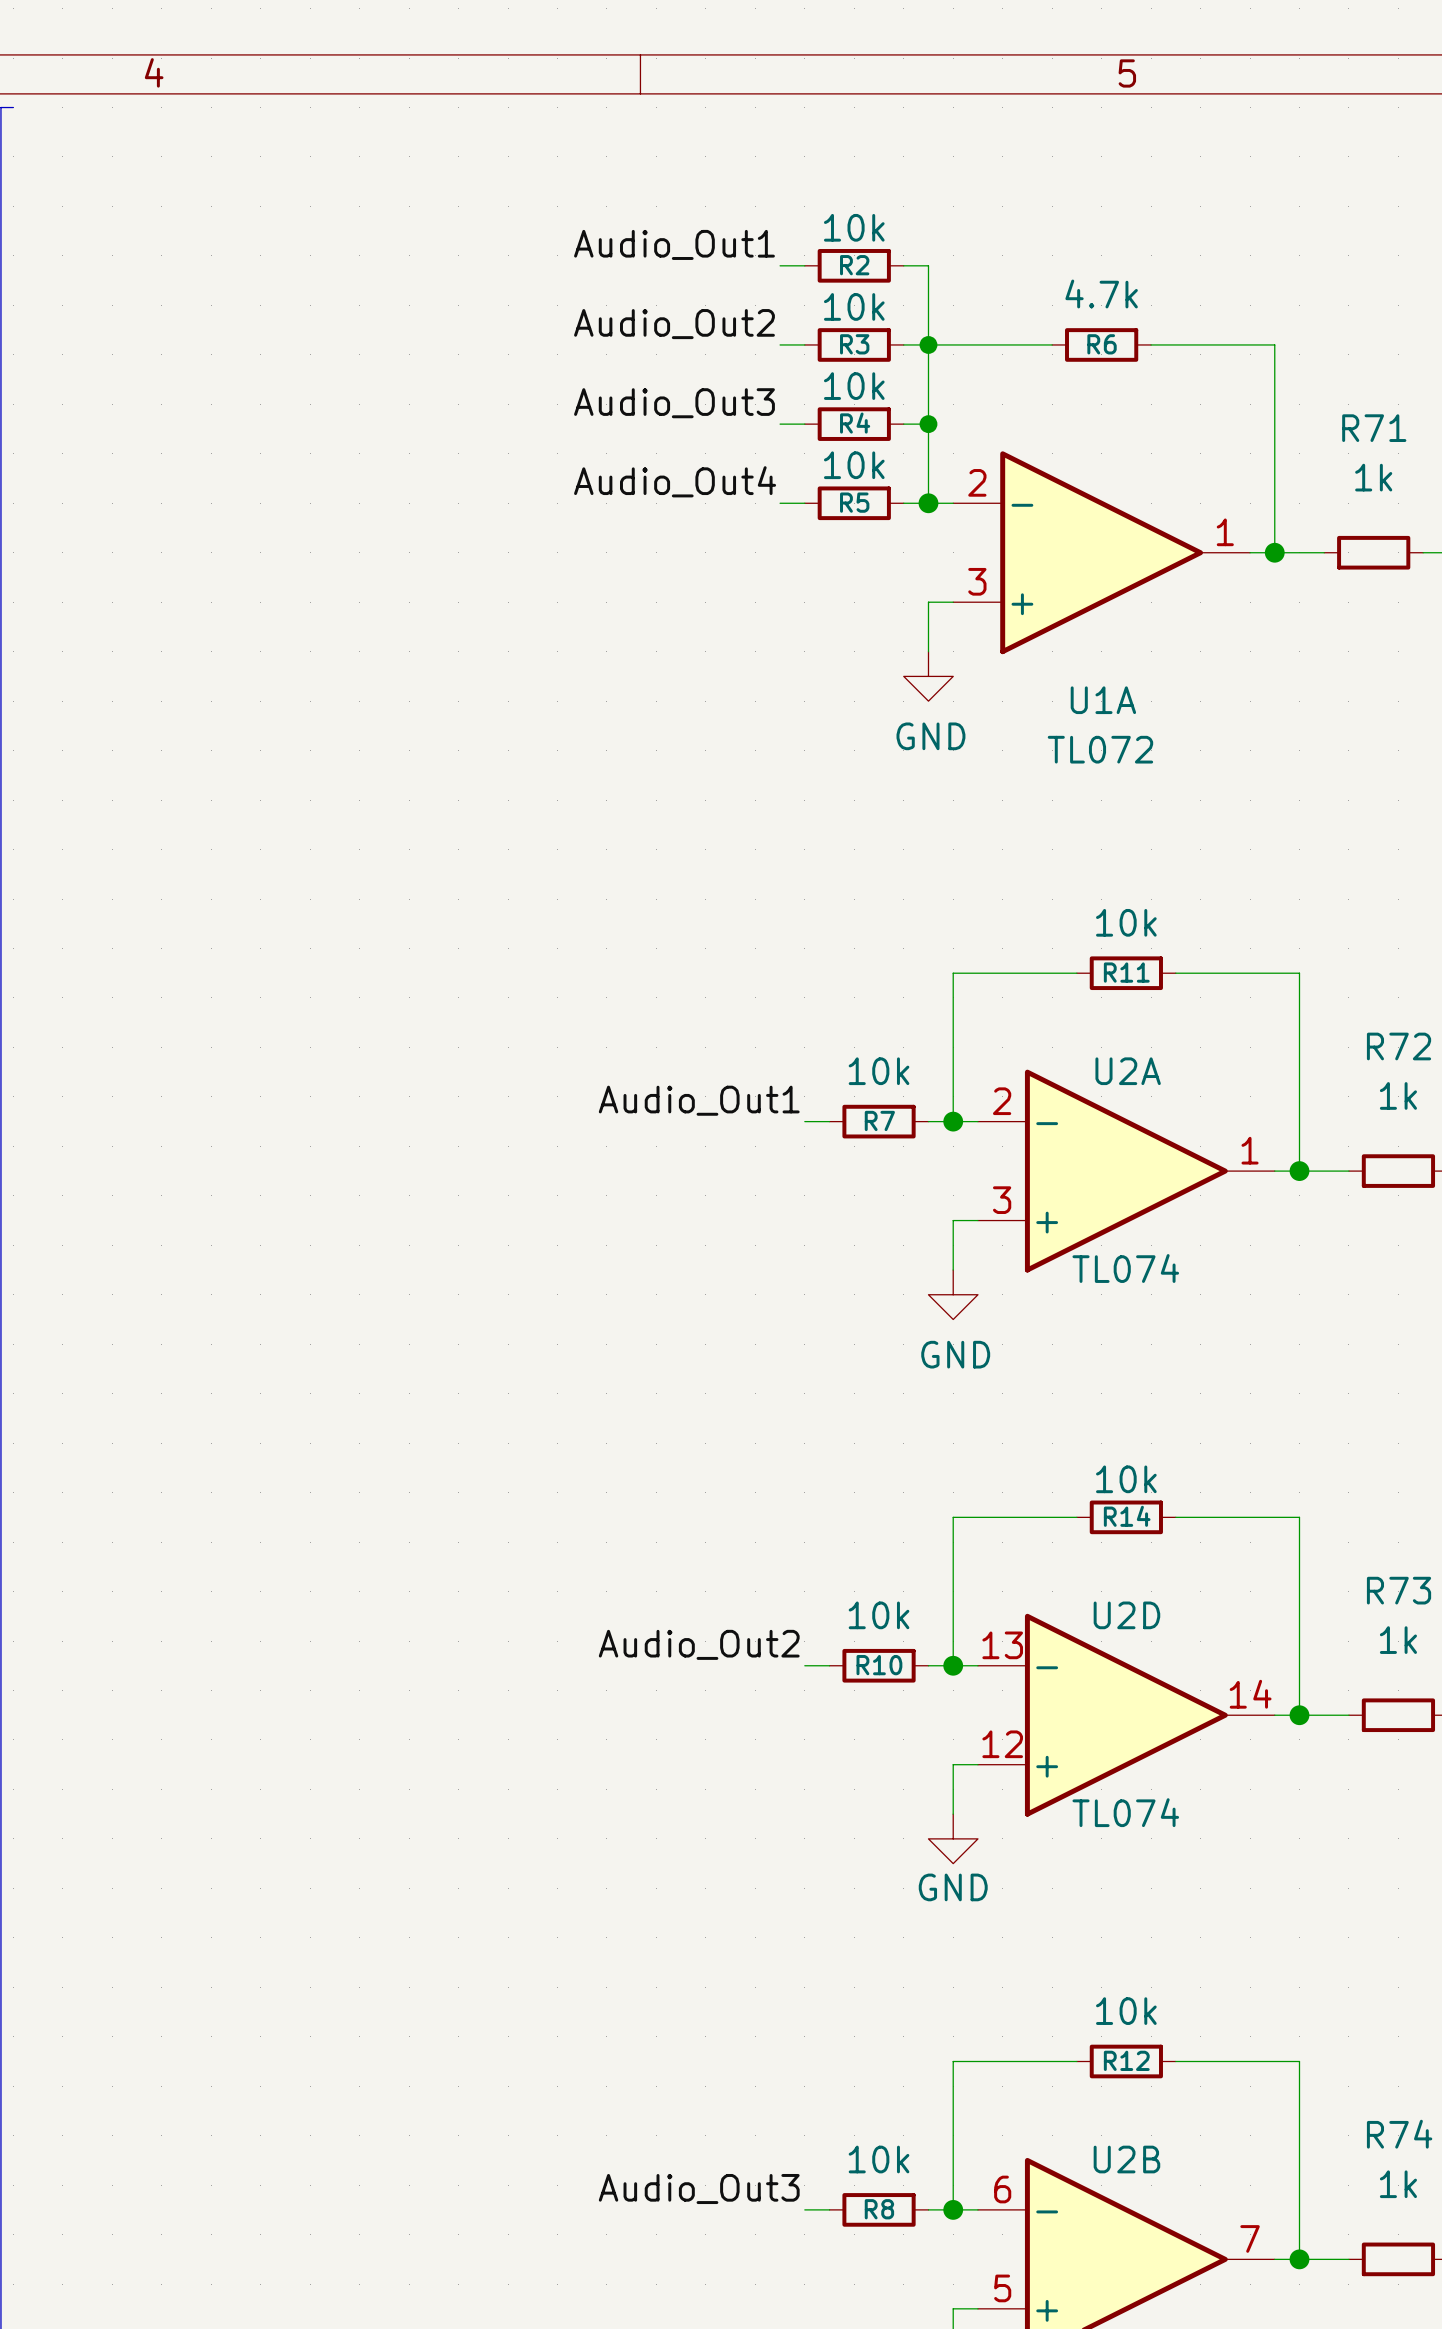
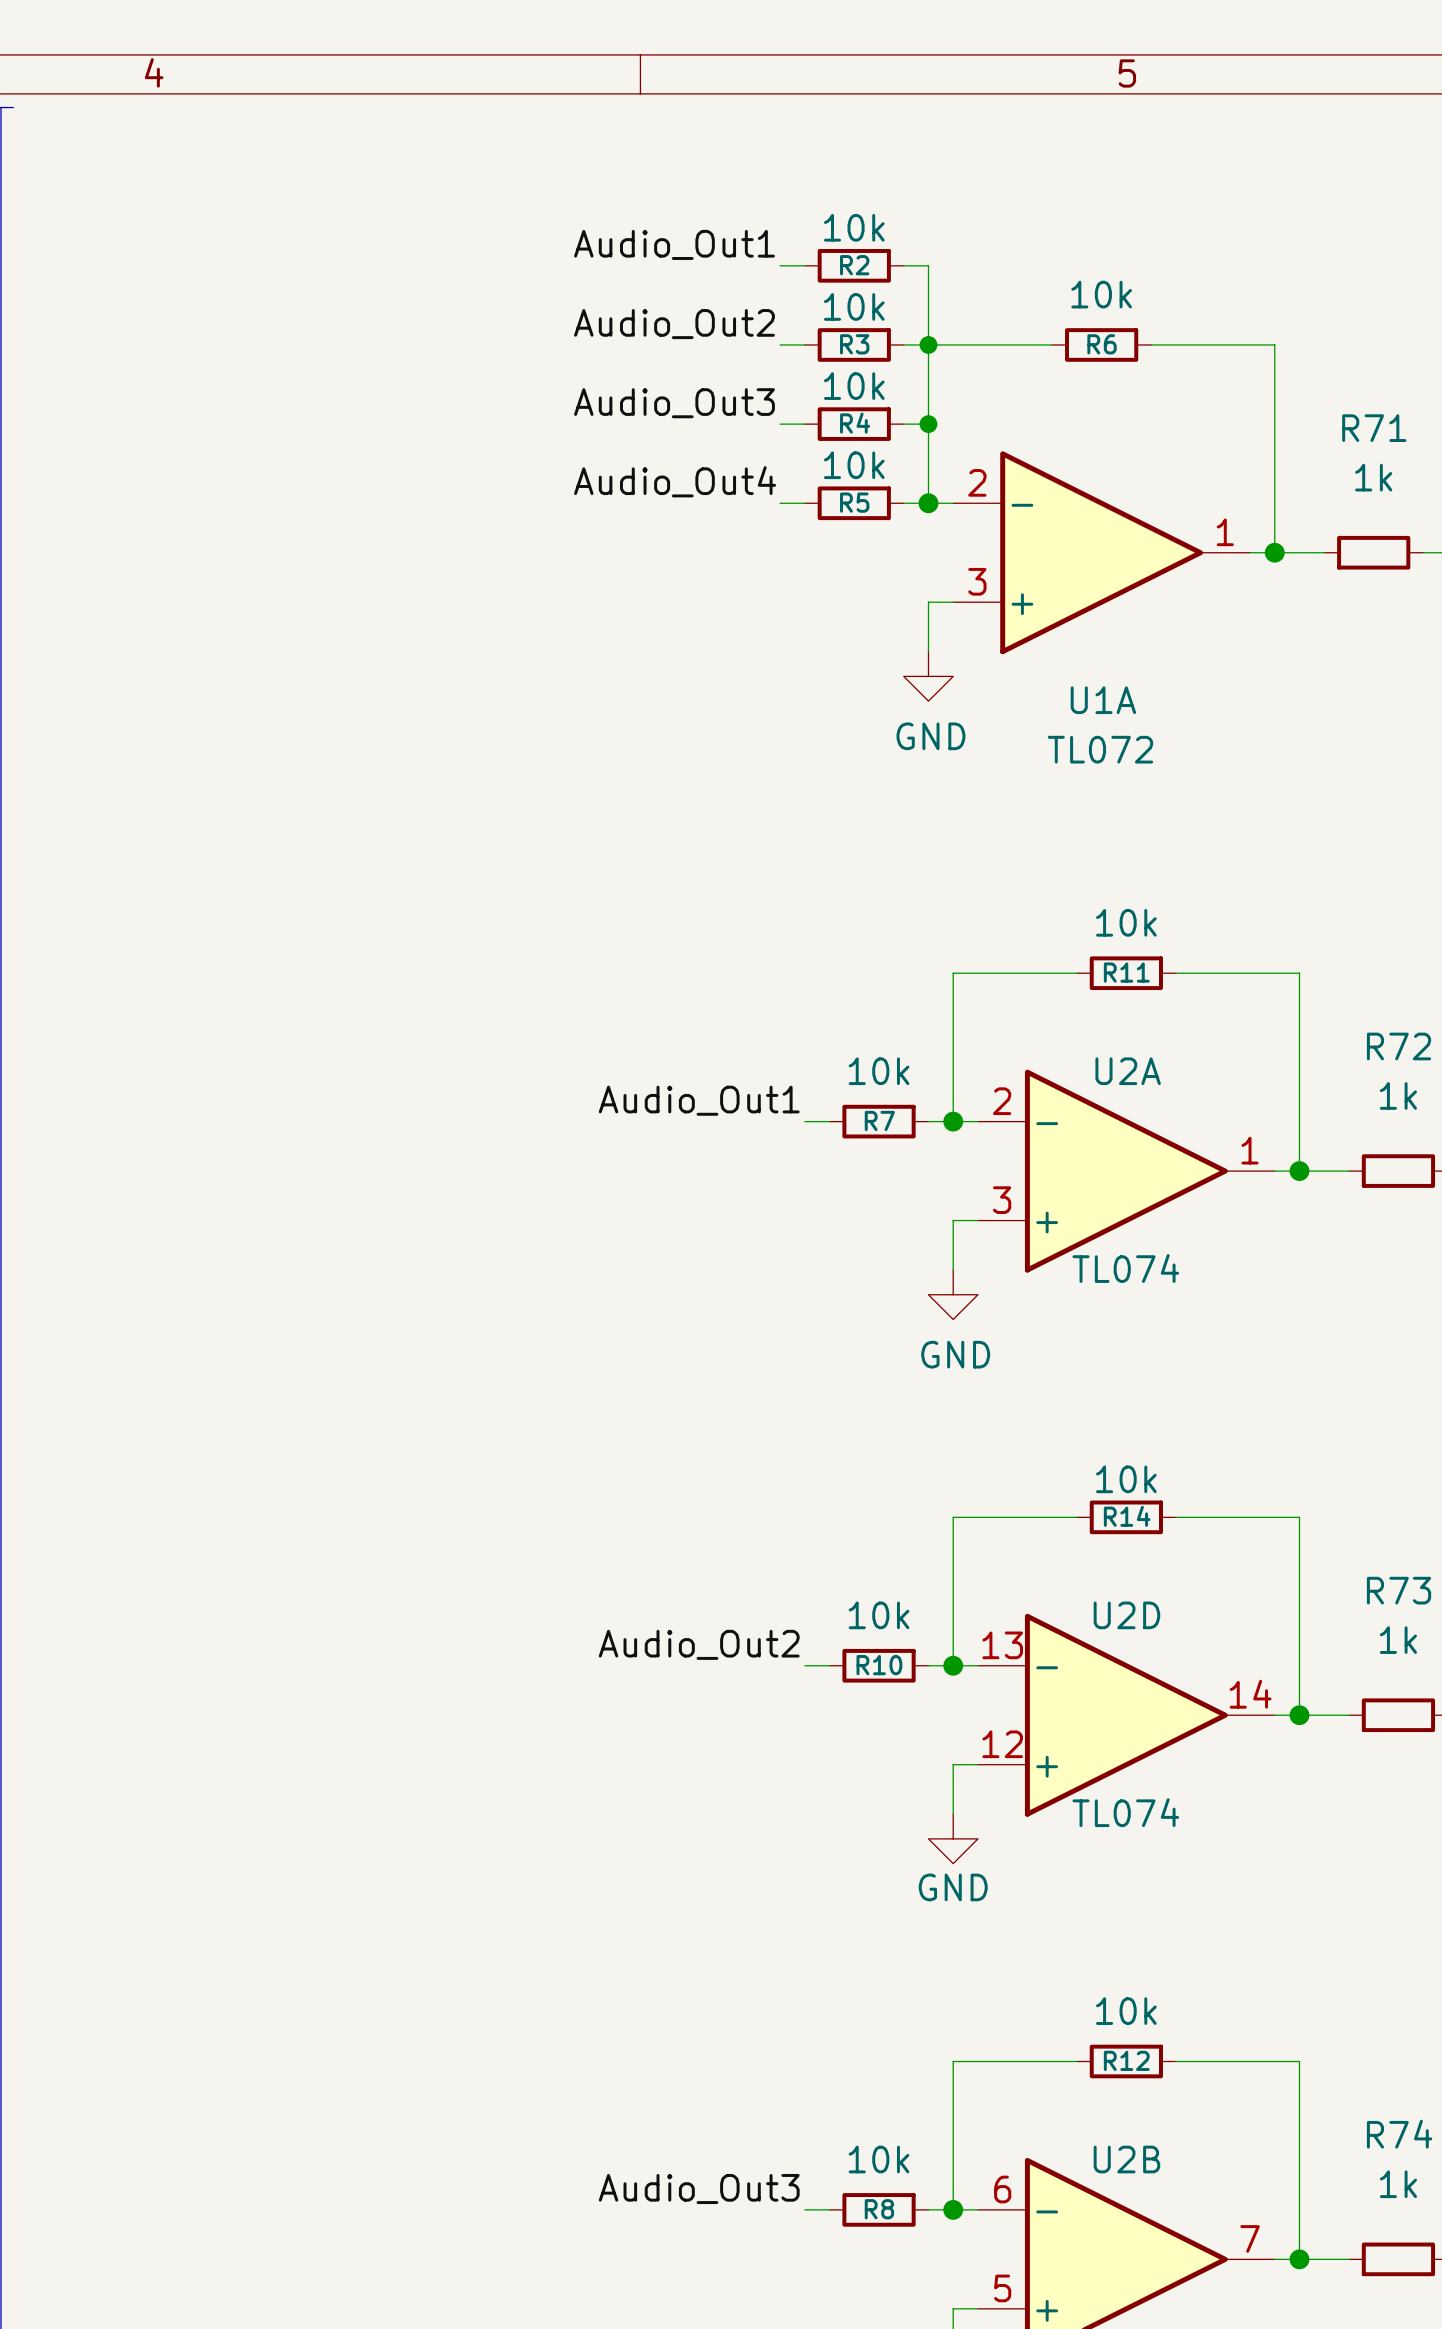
R6 value: 4.7k (1101, 293) -> 10k (1101, 294)

